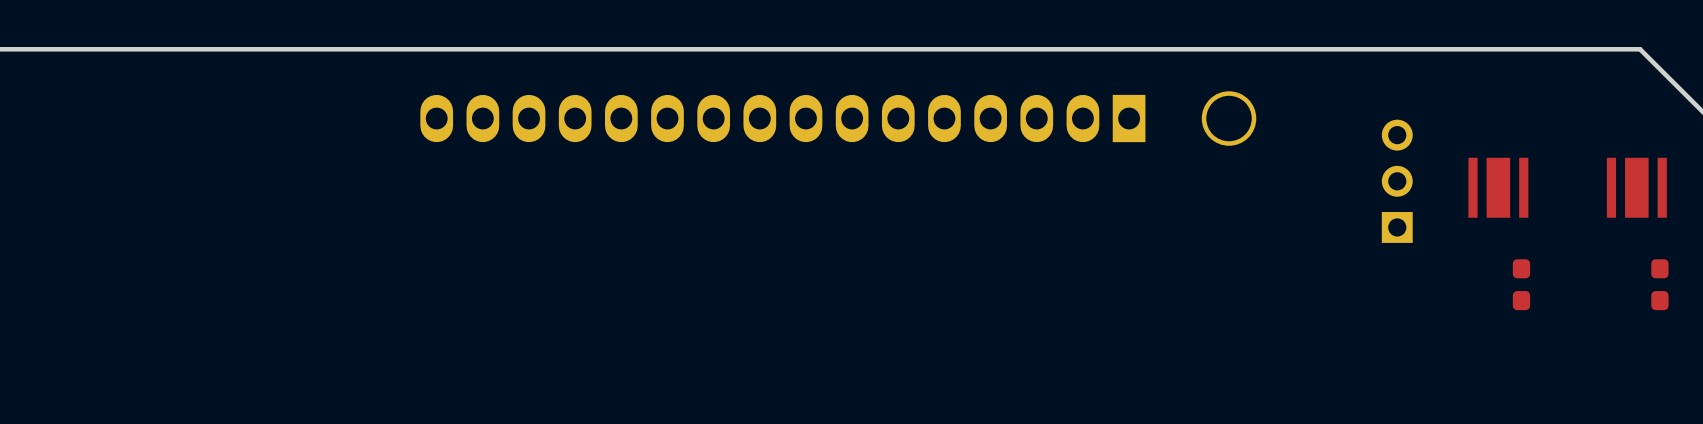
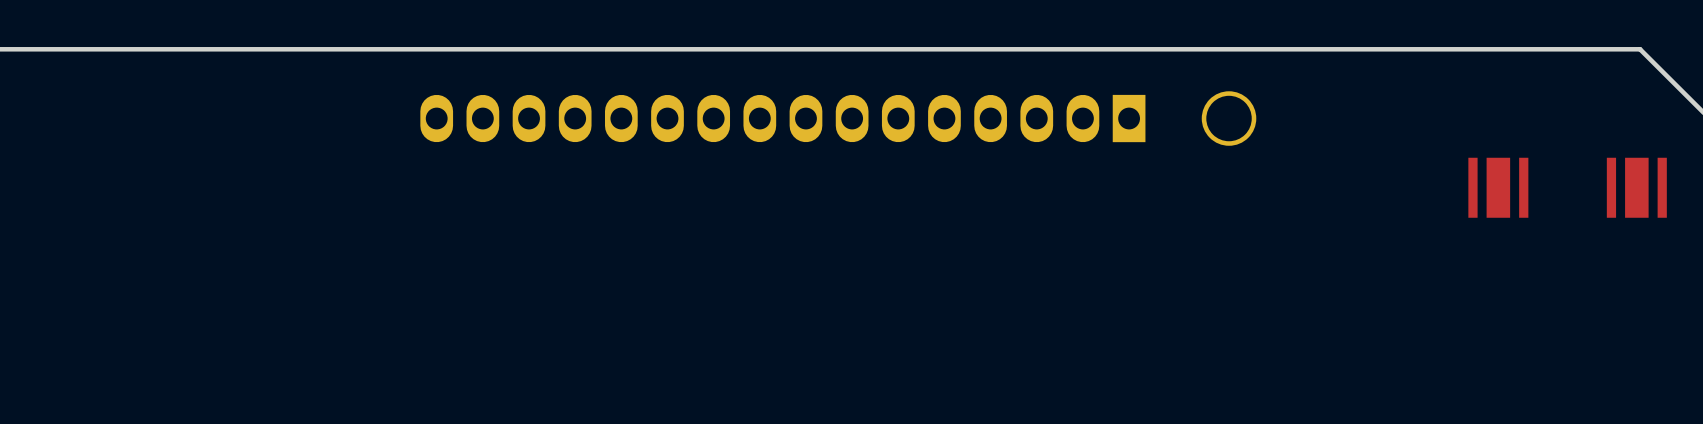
part: (1397, 181) -> none
part: (1521, 284) -> none
part: (1659, 284) -> none

